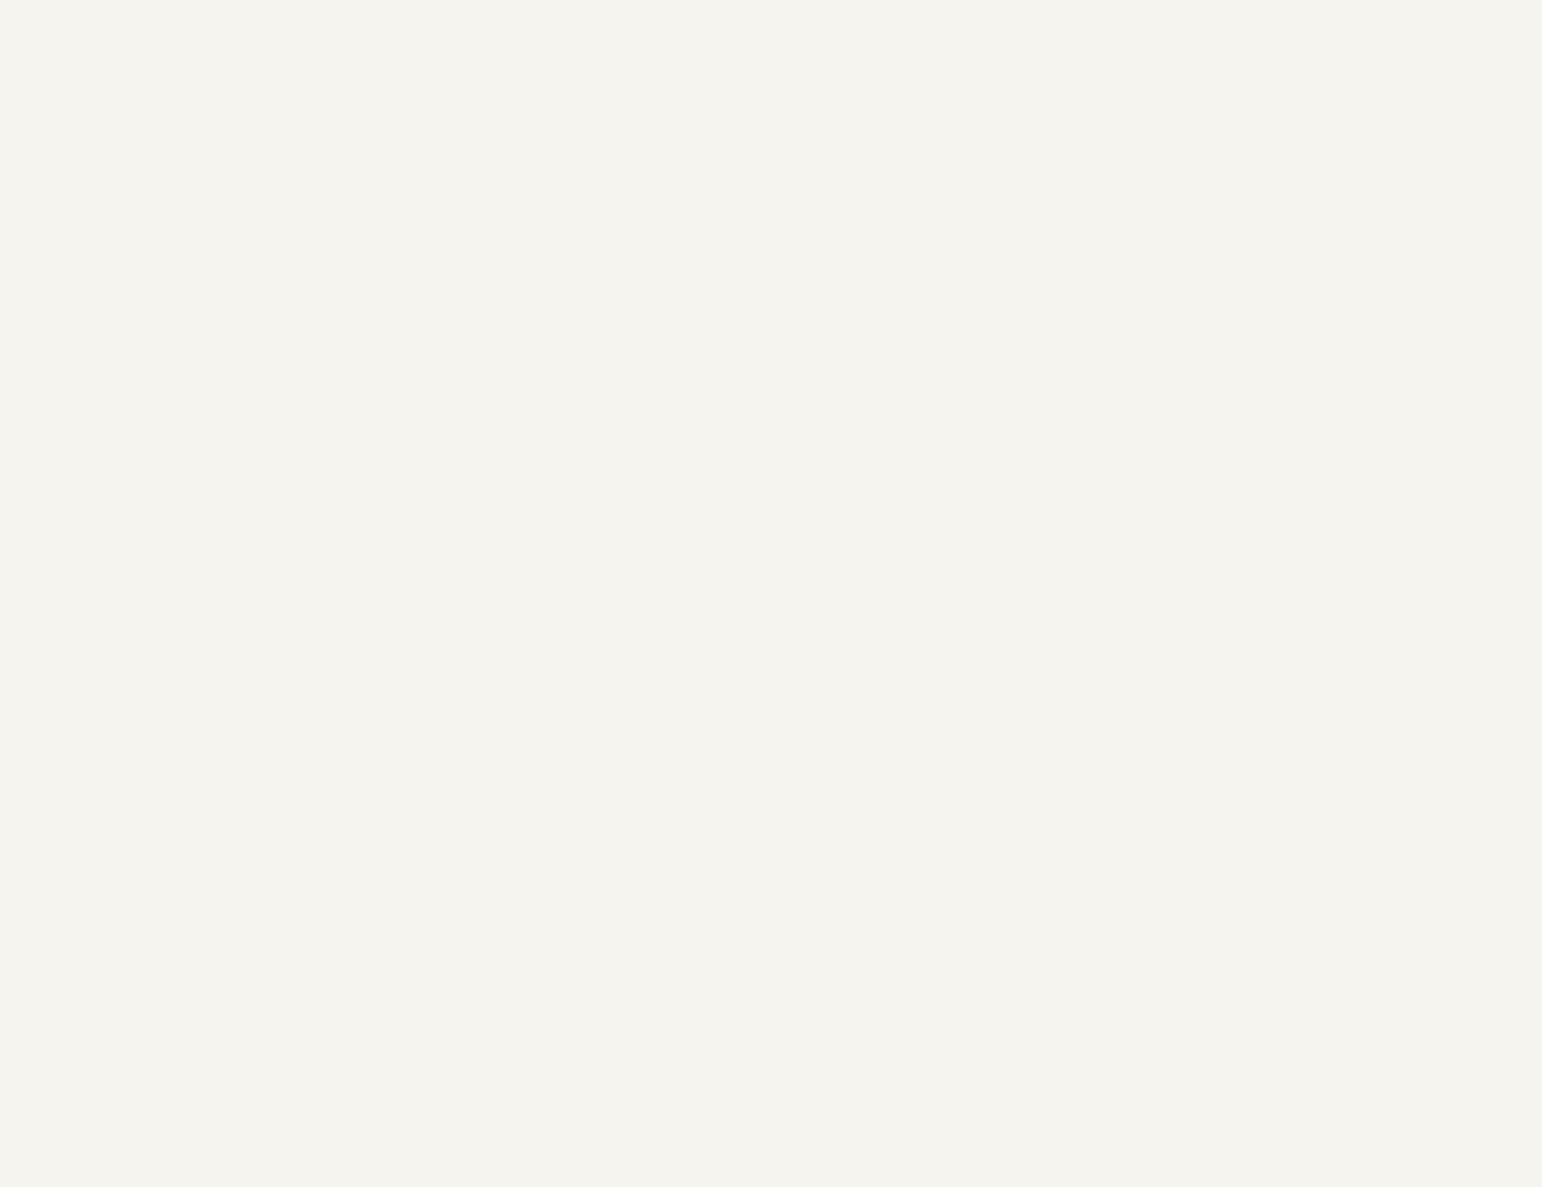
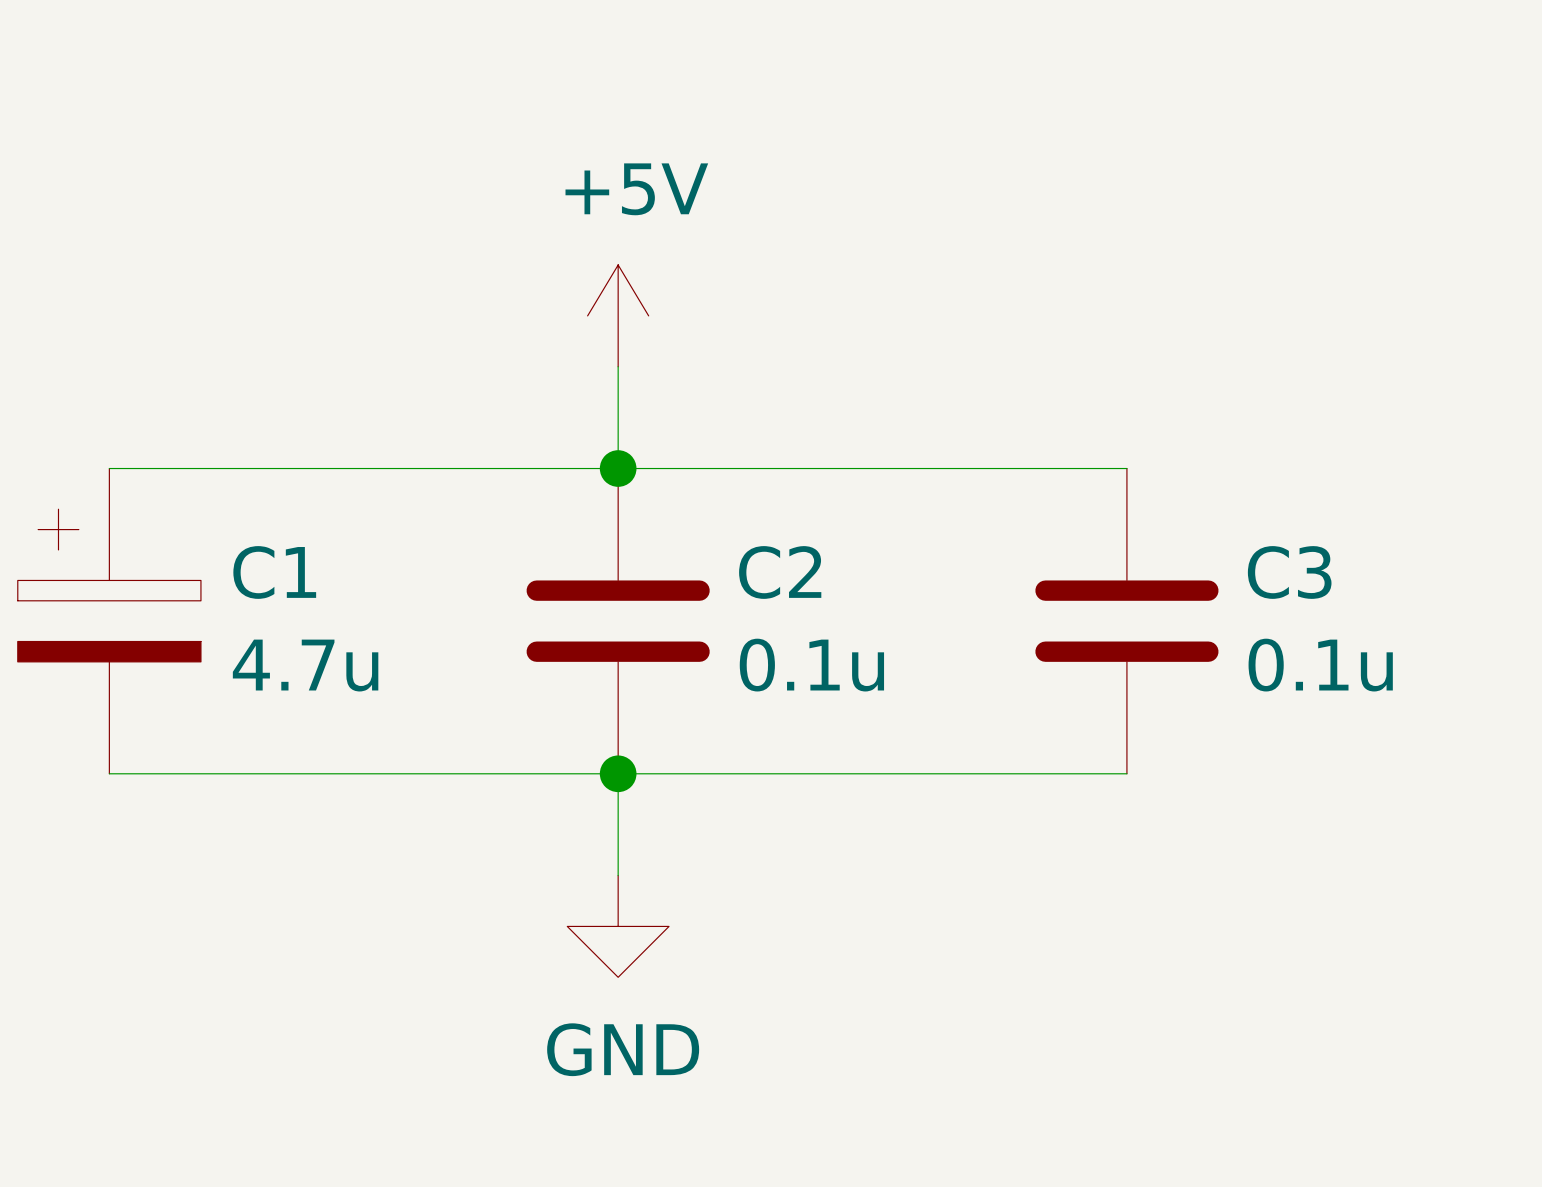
power symbol: none -> +5V (618, 315)
wire: none -> (618, 366) (618, 468)
wire: none -> (109, 468) (1126, 468)
junction: none -> (618, 468)
C1: none -> 4.7u (109, 621)
C2: none -> 0.1u (618, 621)
C3: none -> 0.1u (1126, 621)
wire: none -> (109, 773) (1126, 773)
wire: none -> (618, 773) (618, 875)
junction: none -> (618, 773)
power symbol: none -> GND (618, 926)

